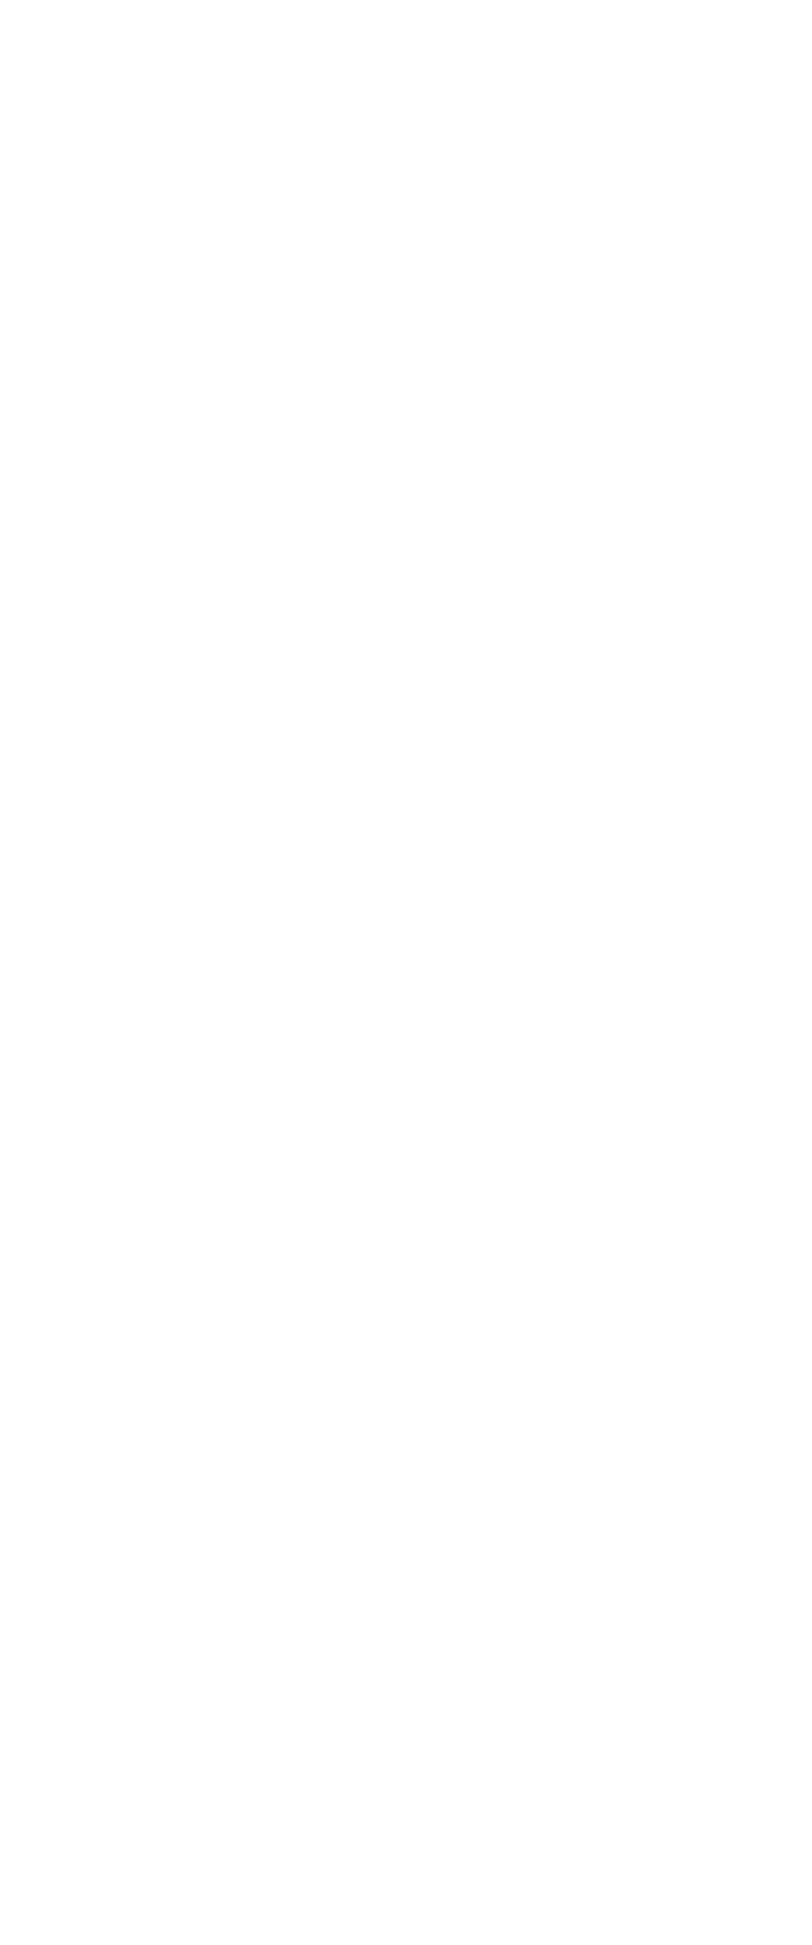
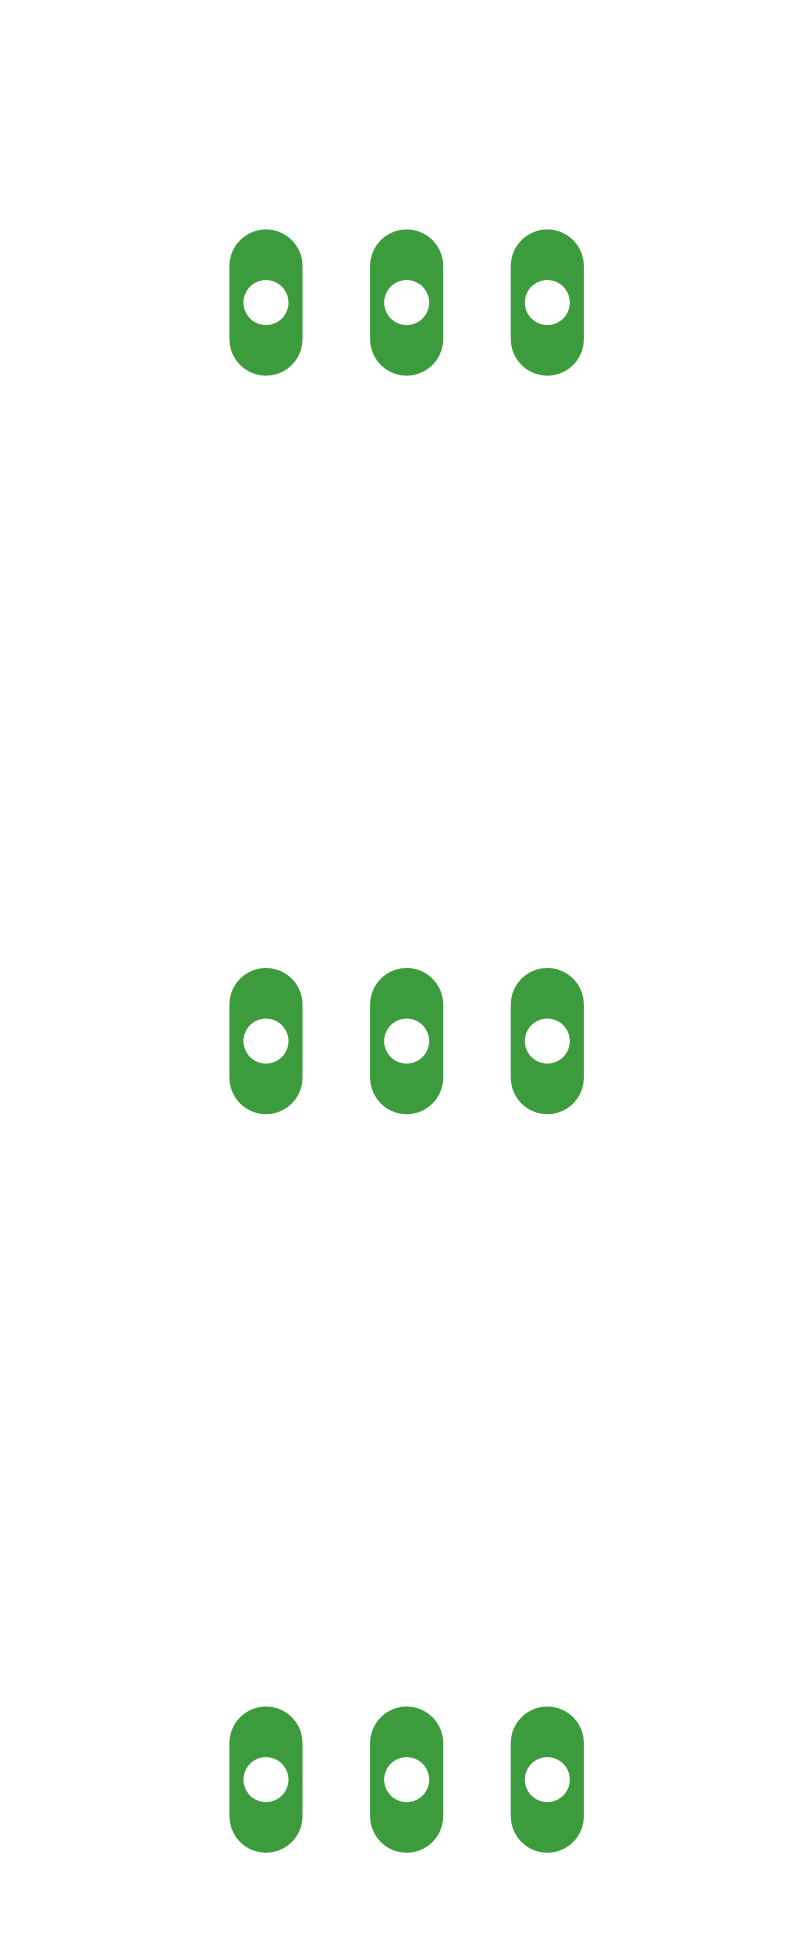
part: none -> (406, 302)
part: none -> (406, 1041)
part: none -> (406, 1779)

